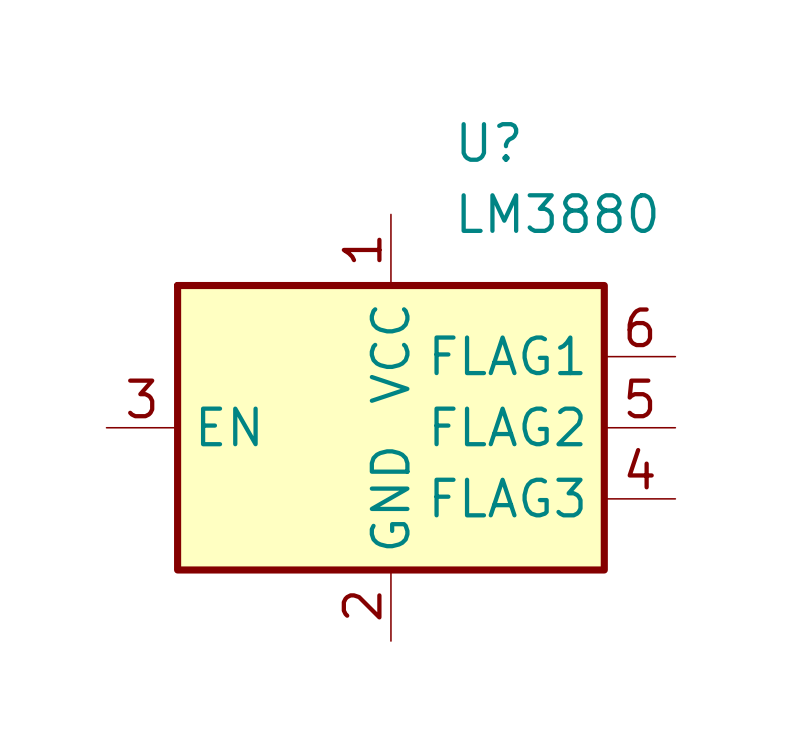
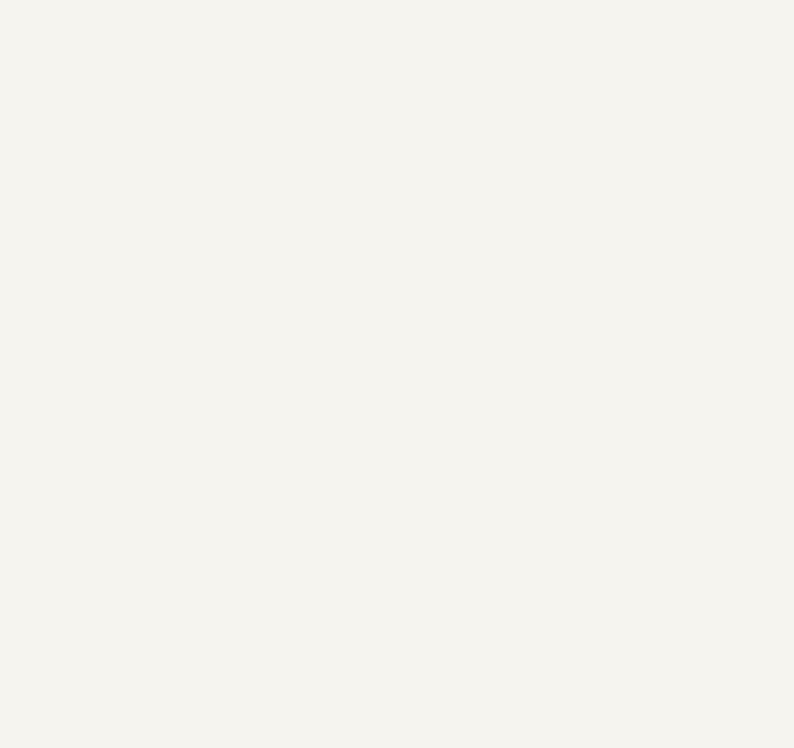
U?: LM3880 (390, 427) -> none

